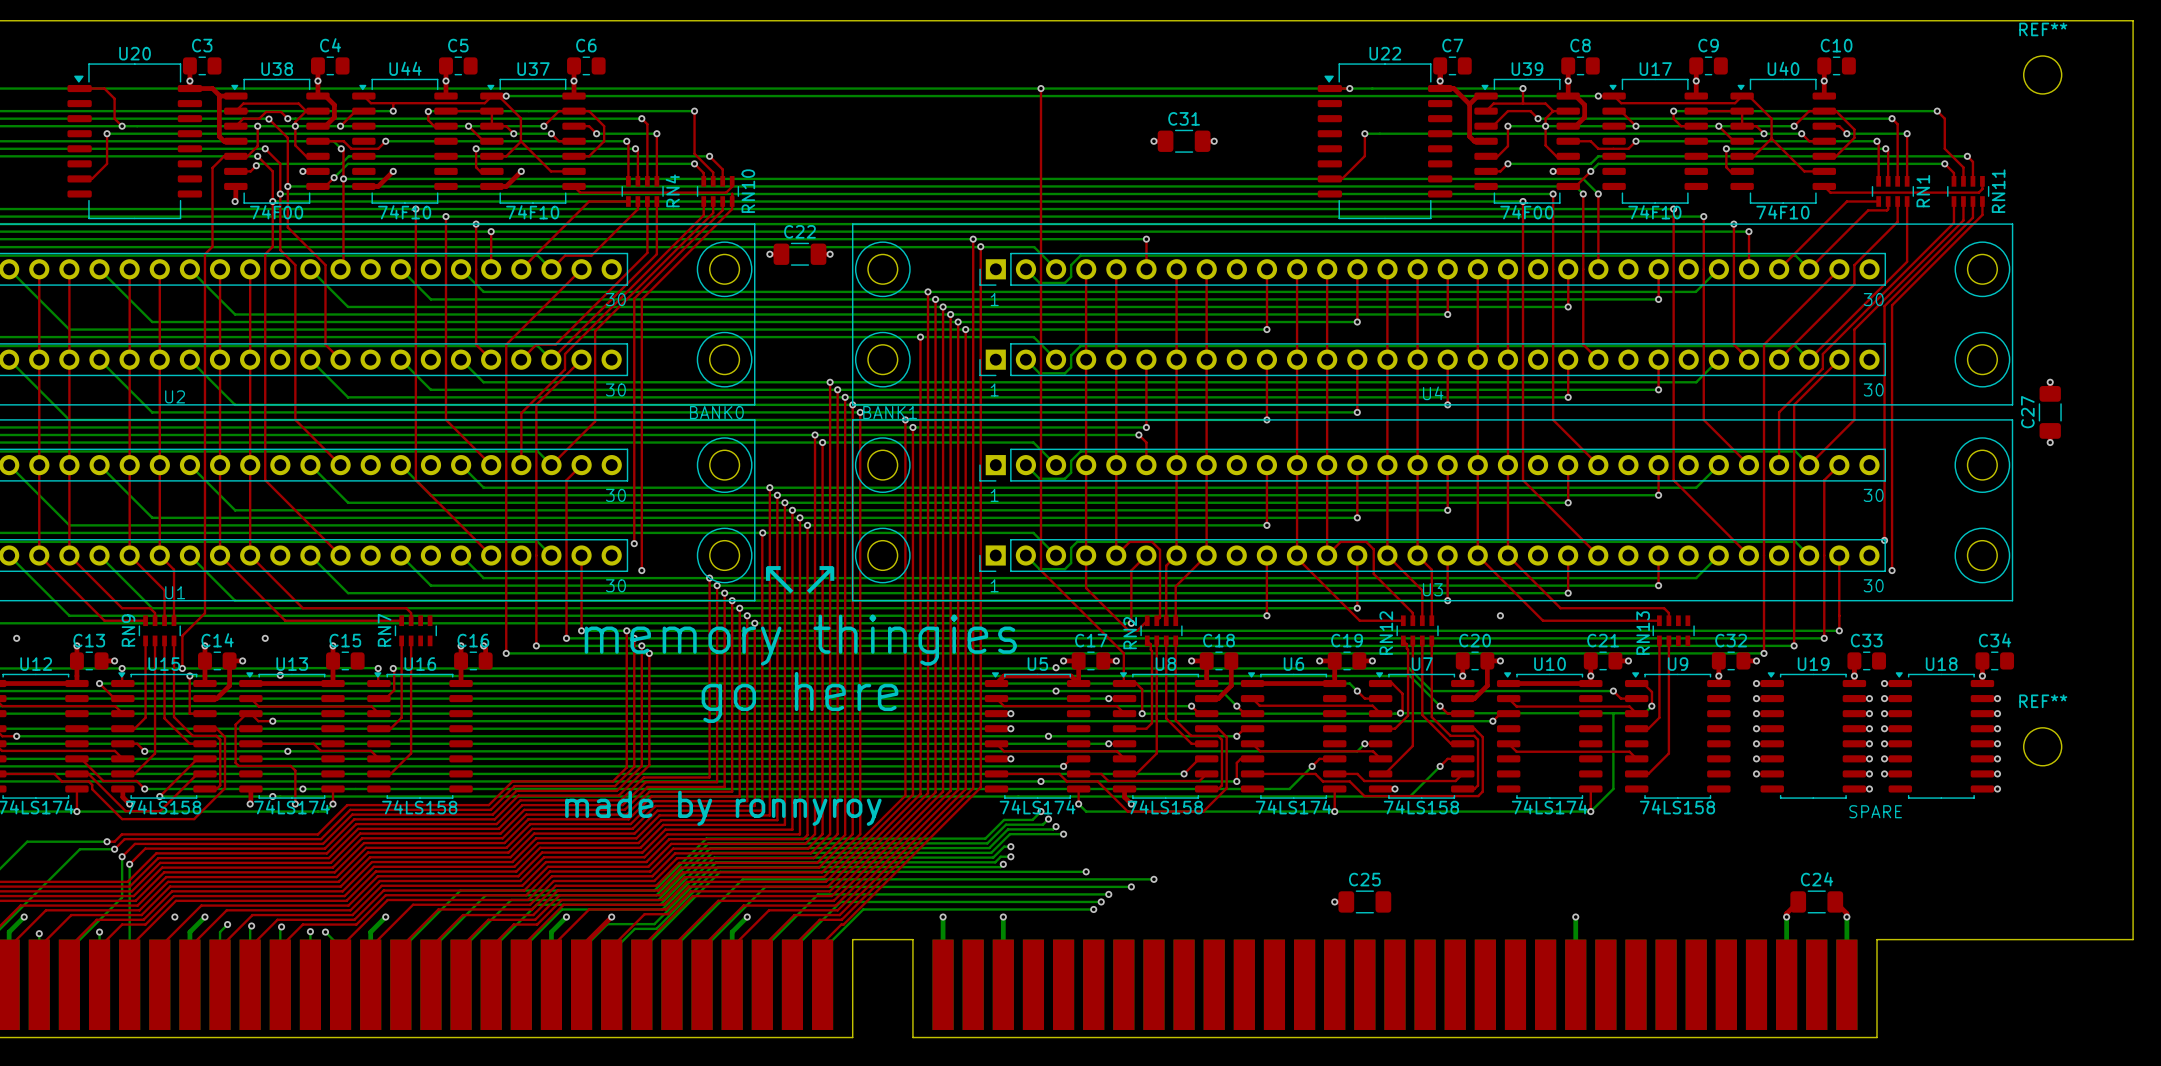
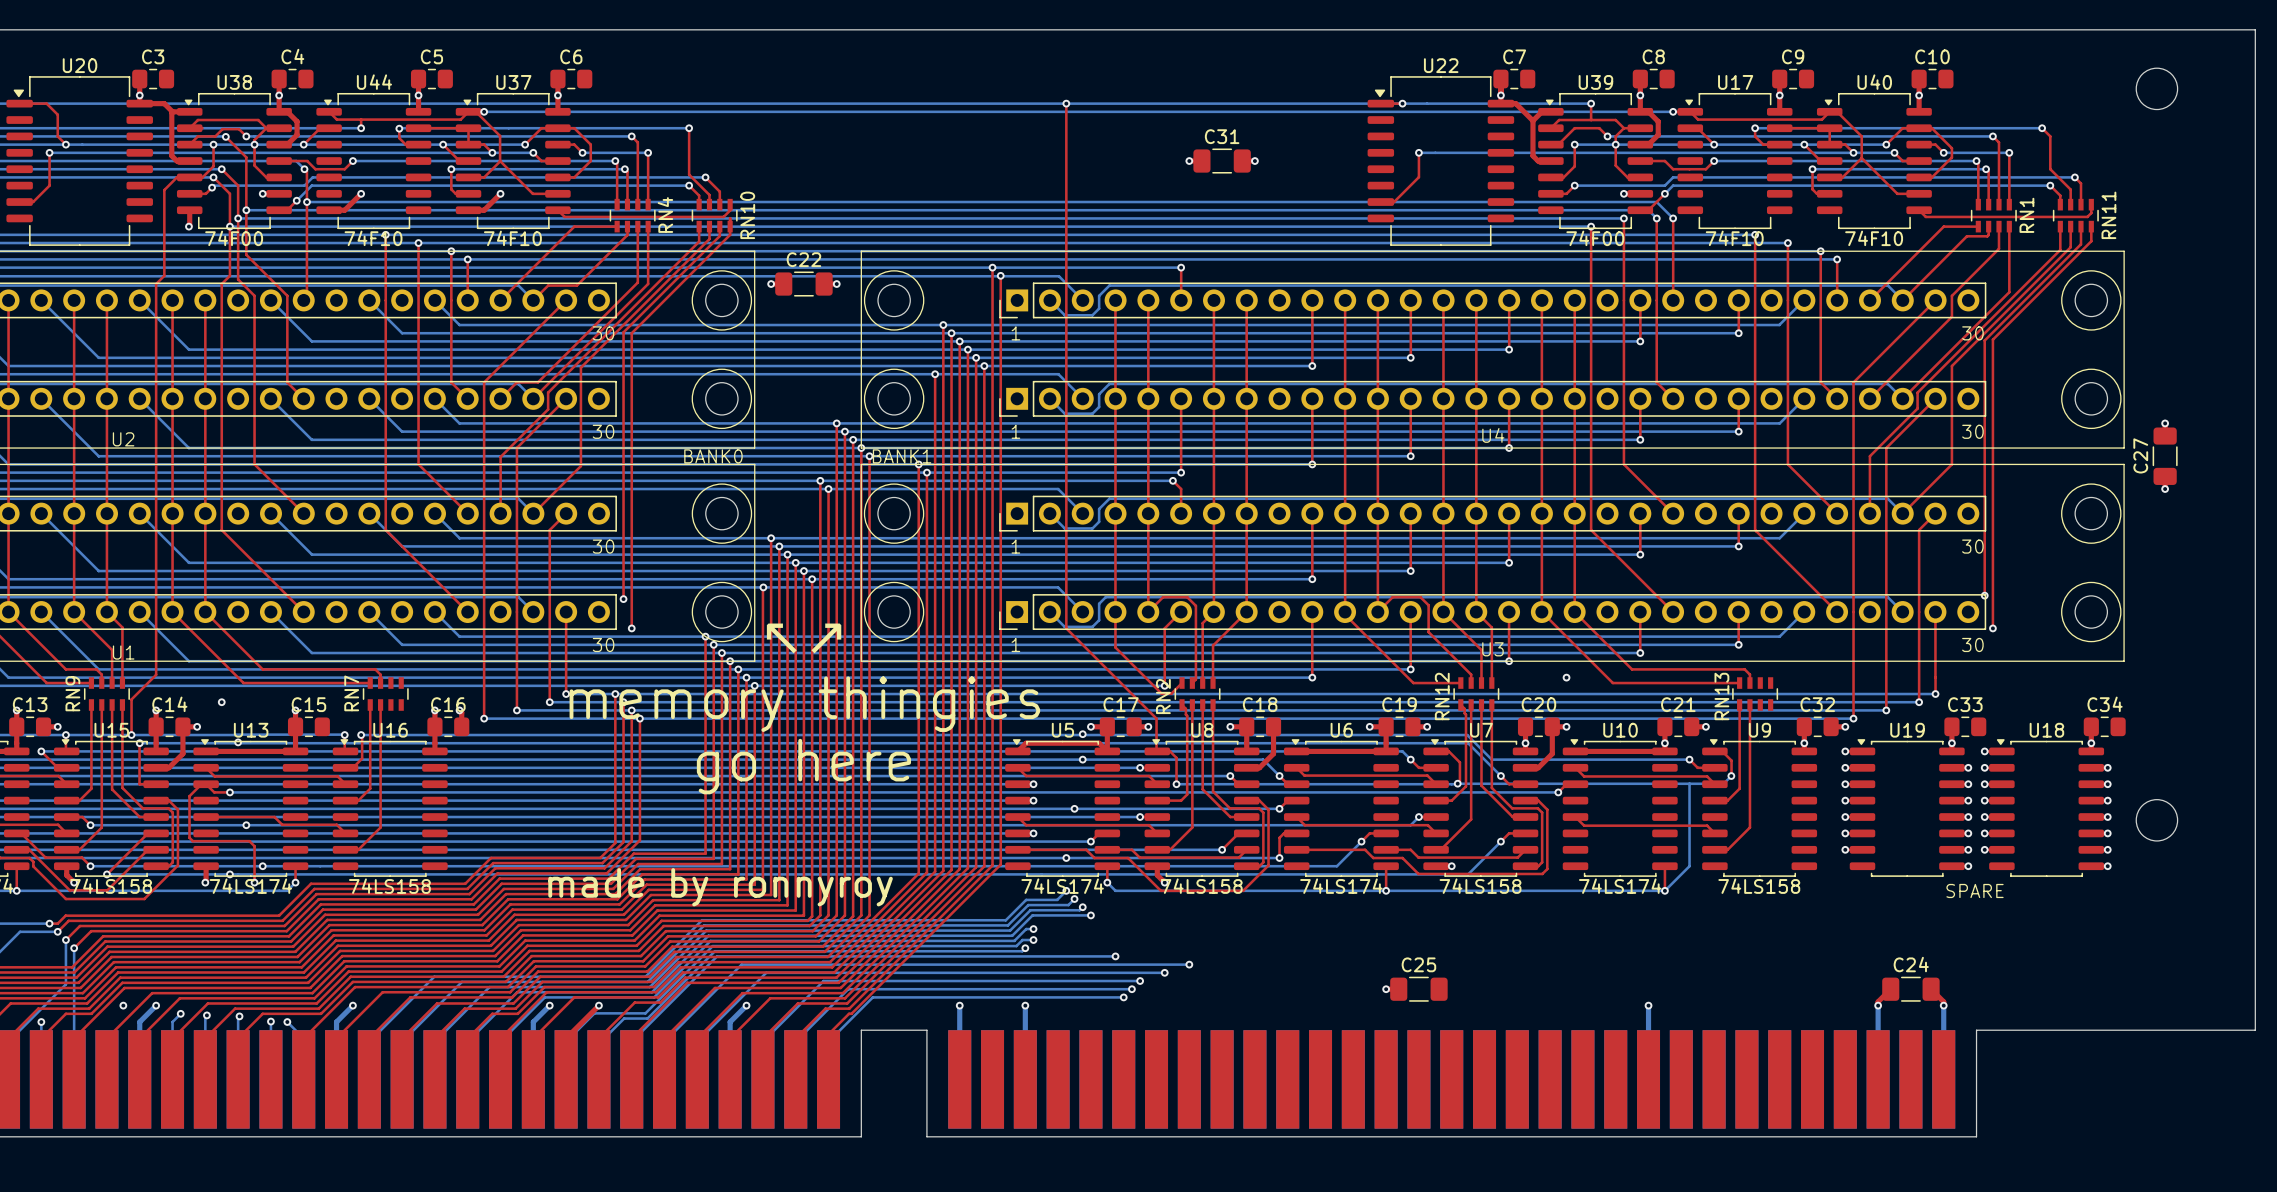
REF** name: REF** (2043, 29) -> none
REF** name: REF** (2043, 701) -> none

